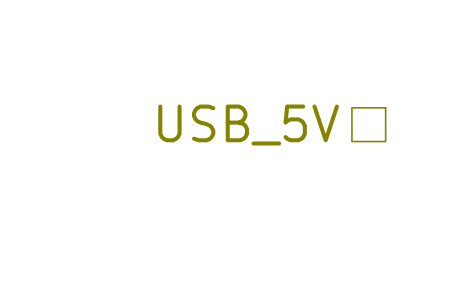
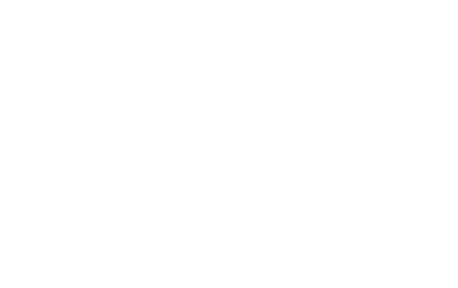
hierarchical label: USB_5V (248, 125) -> none

